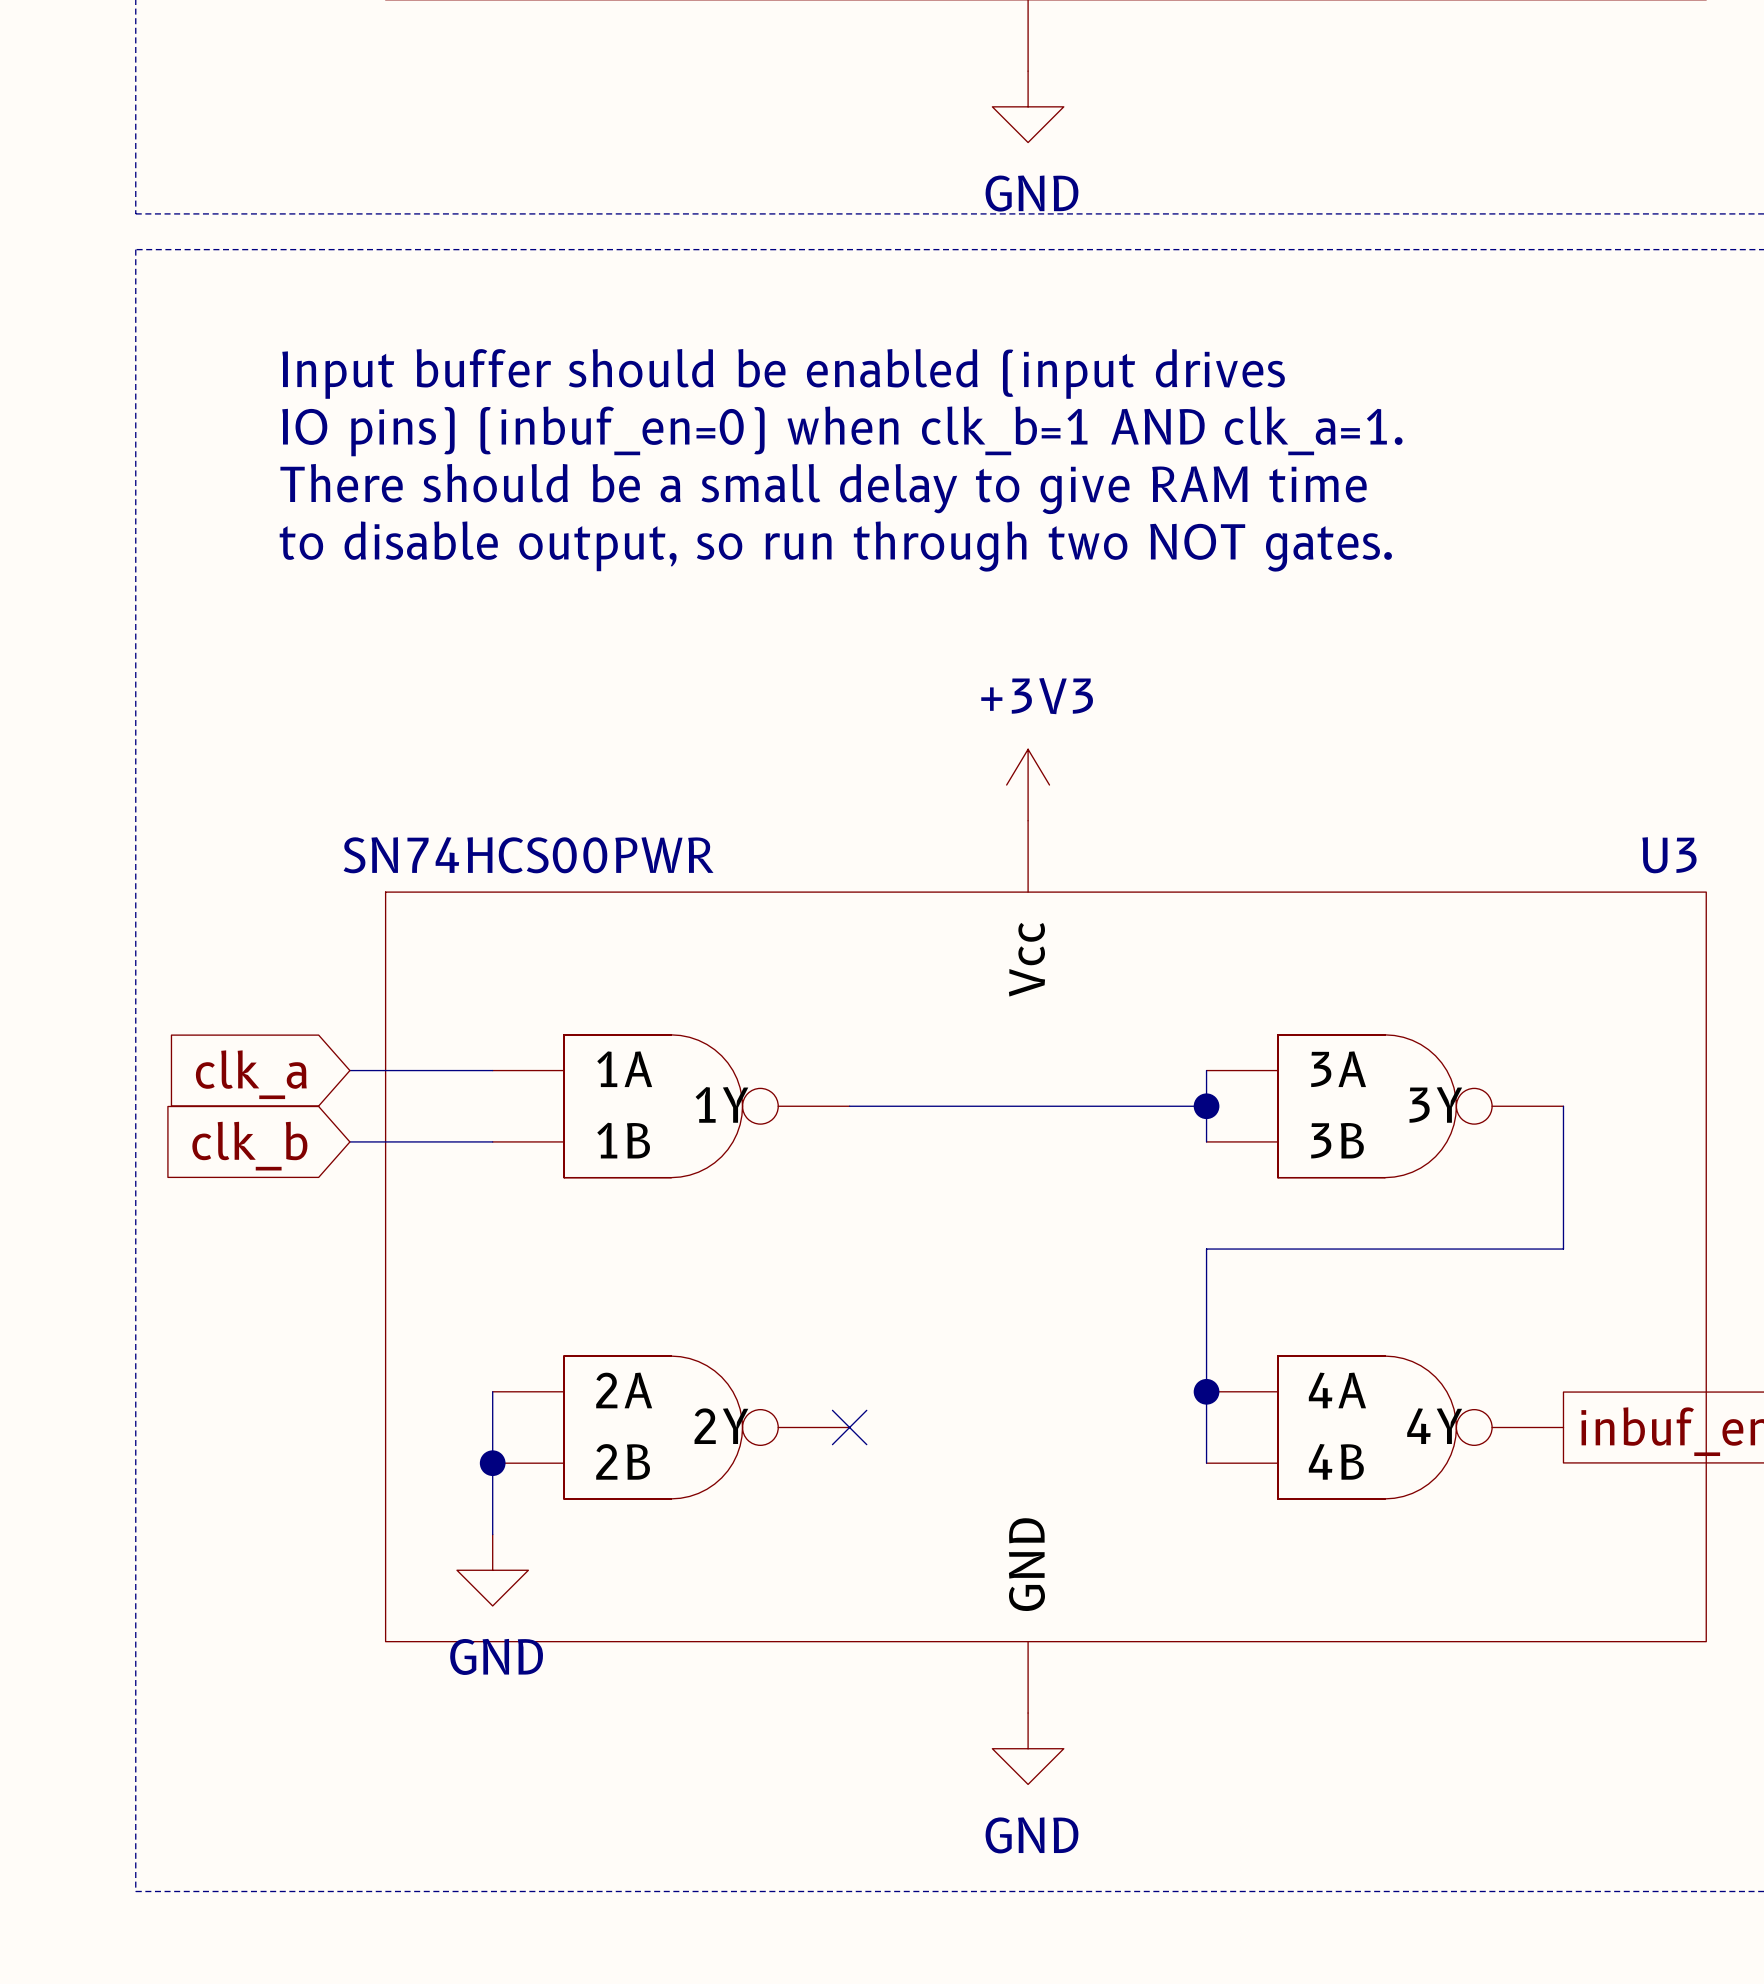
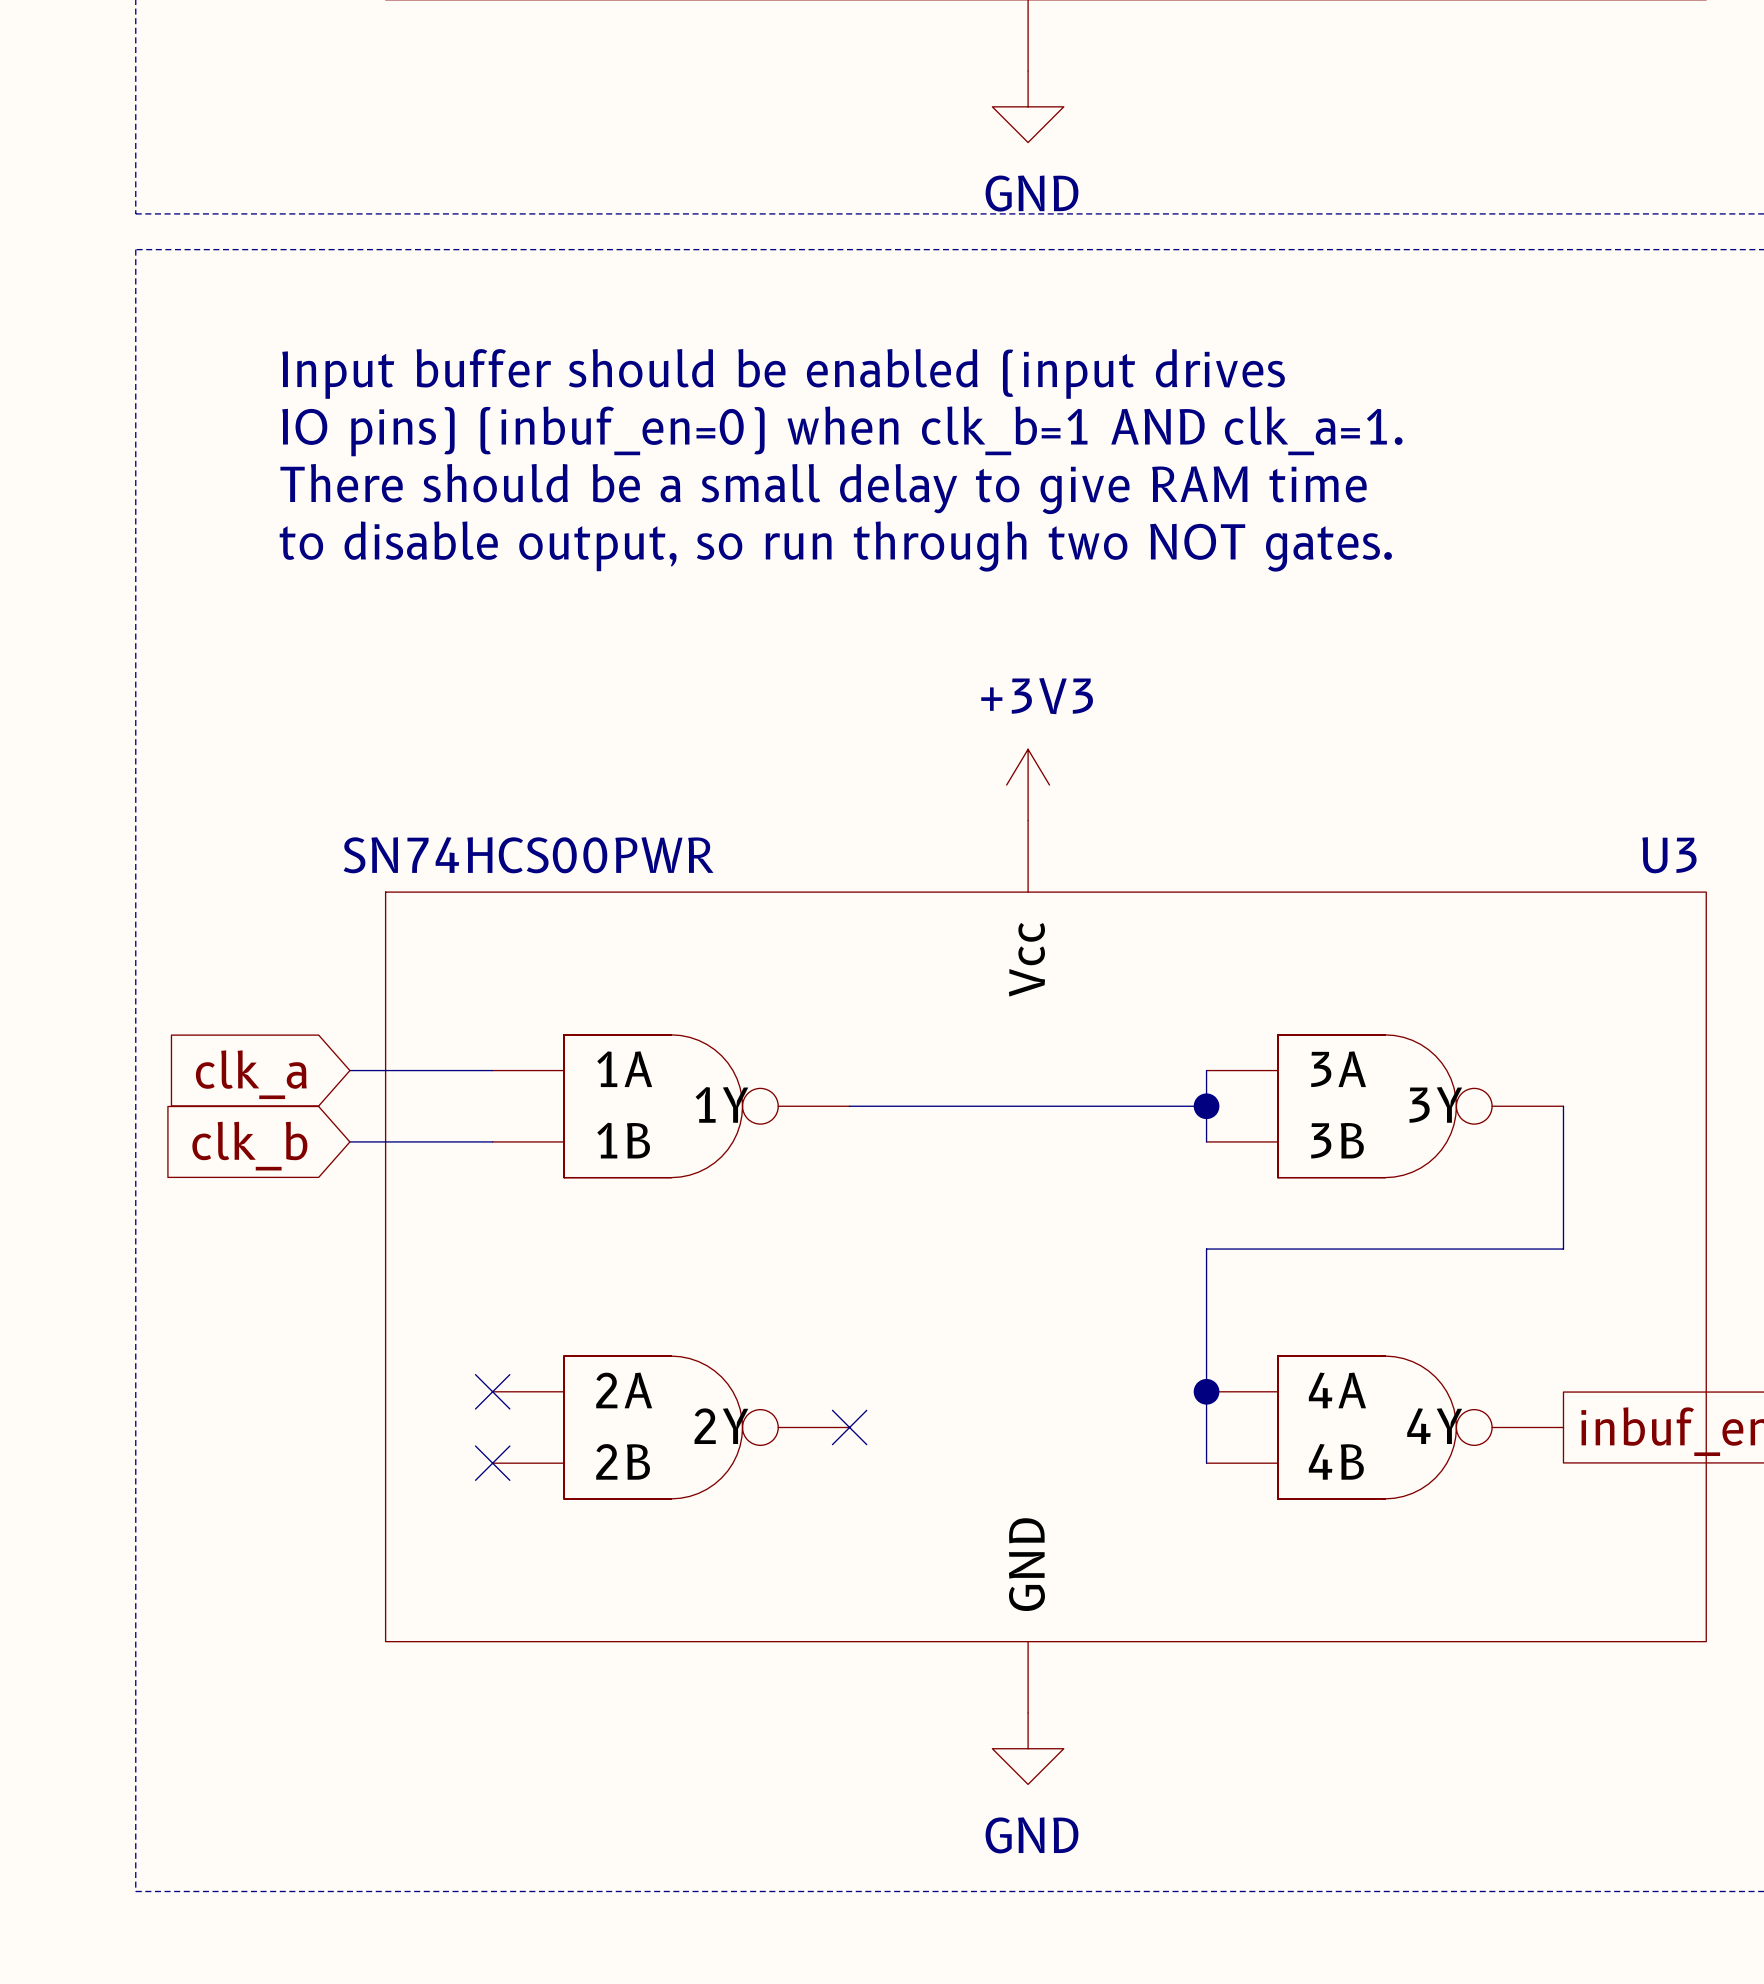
wire: (492, 1391) (492, 1534) -> none
no-connect mark: none -> (492, 1391)
junction: (492, 1463) -> none
no-connect mark: none -> (492, 1463)
power symbol: GND (492, 1570) -> none

